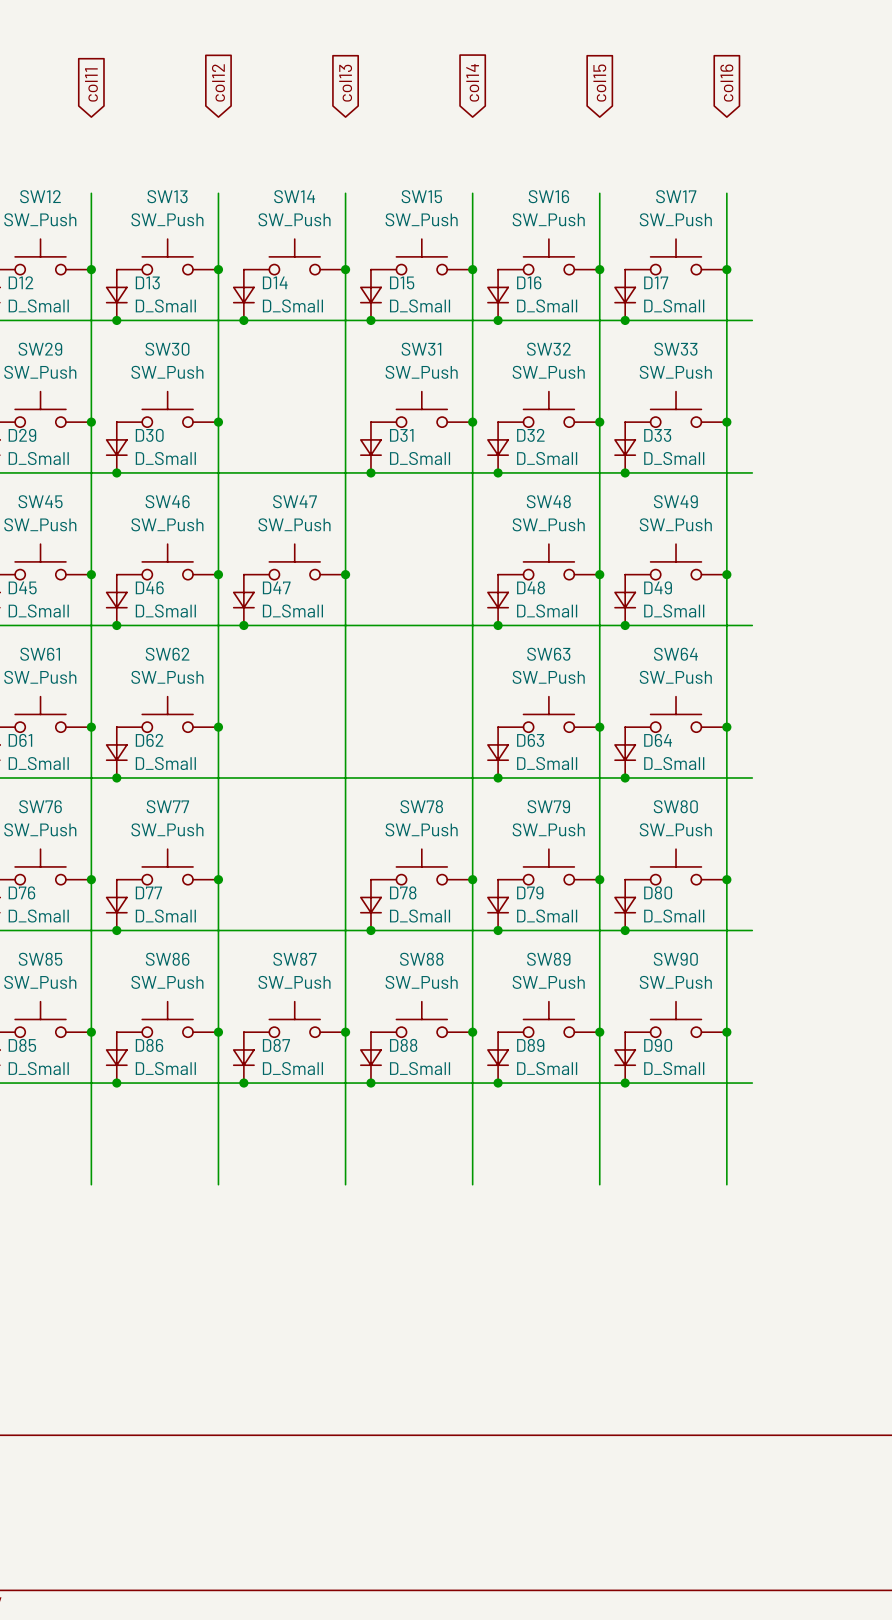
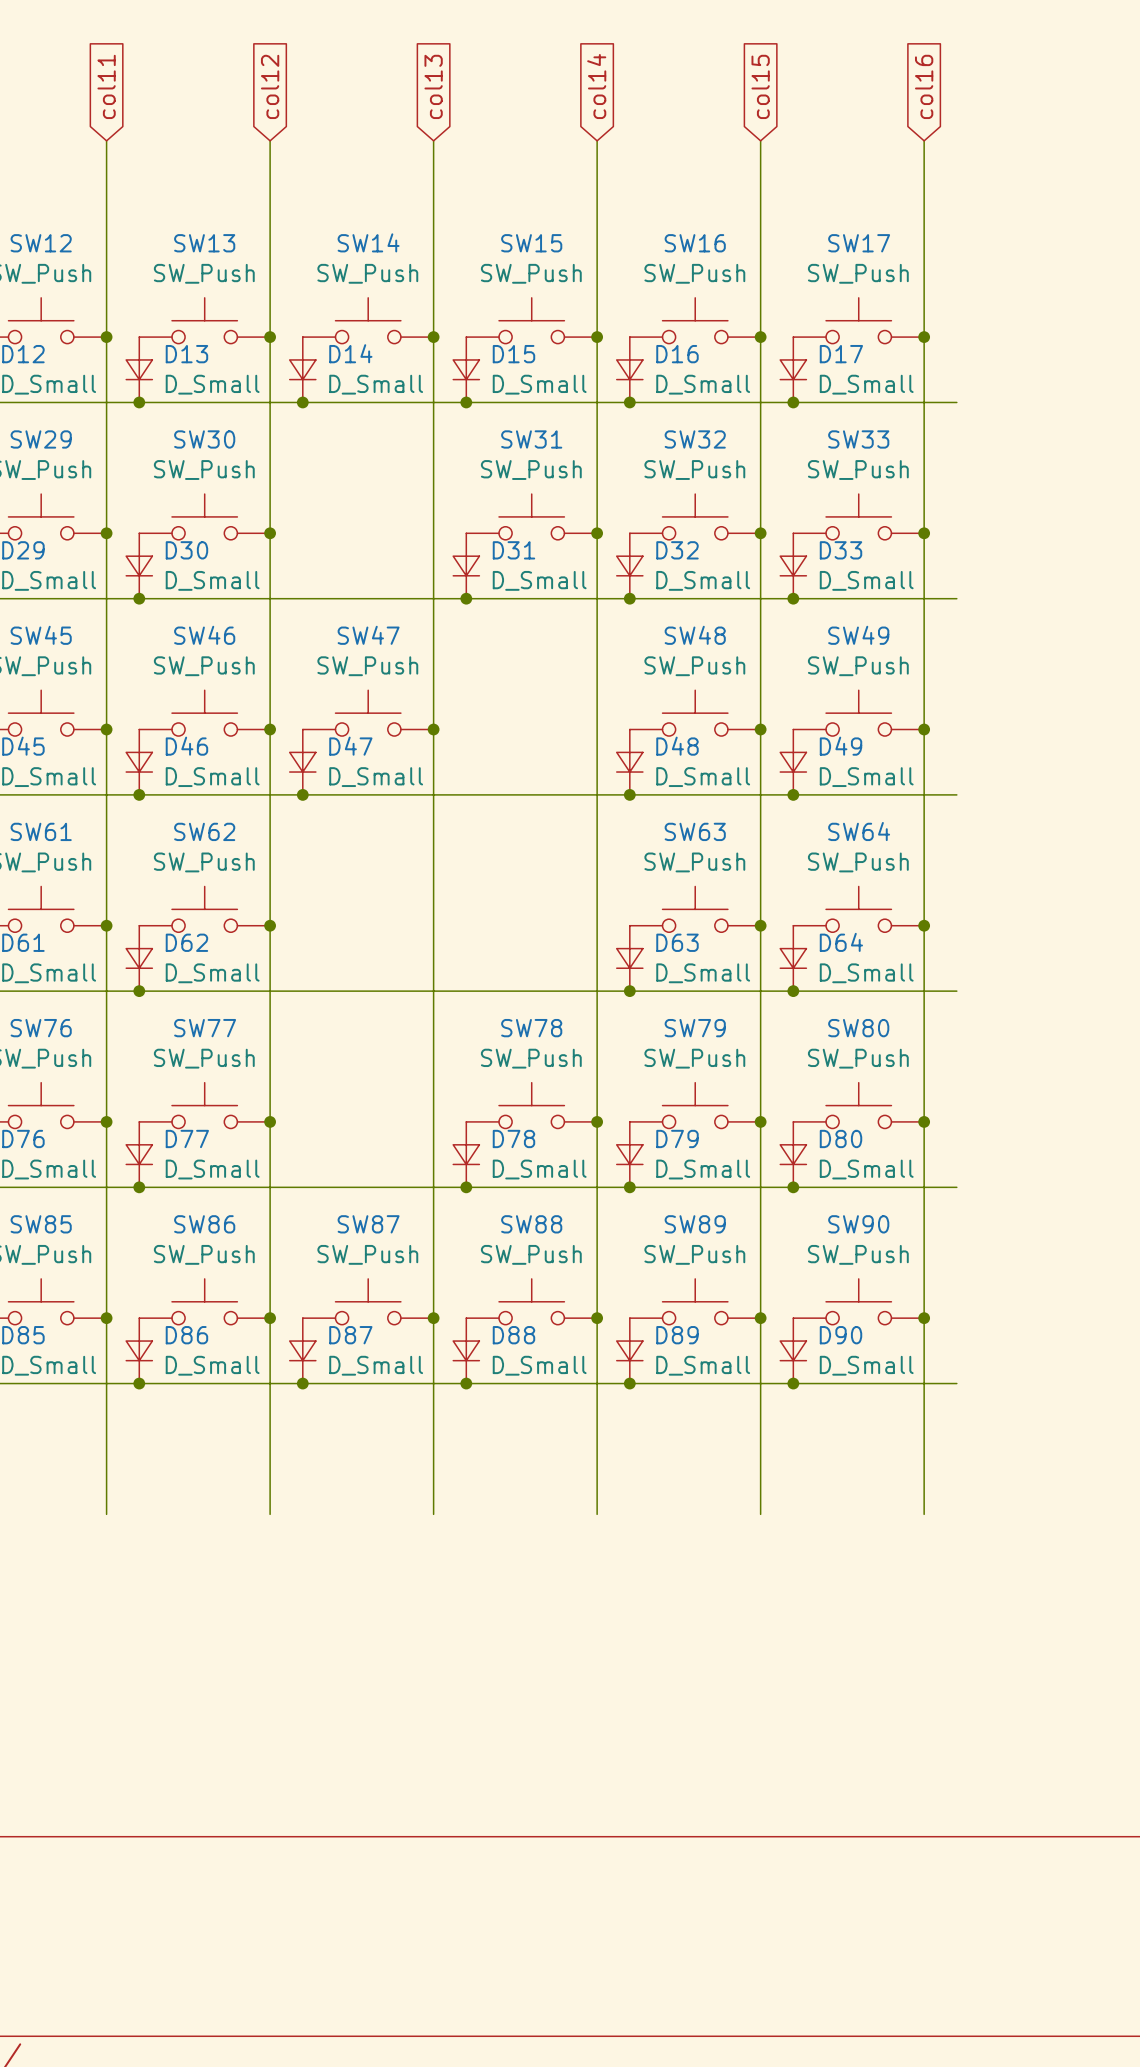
wire: none -> (106, 140) (106, 238)
wire: none -> (270, 140) (270, 238)
wire: none -> (433, 140) (433, 238)
wire: none -> (597, 140) (597, 238)
wire: none -> (760, 140) (760, 238)
wire: none -> (924, 140) (924, 238)

